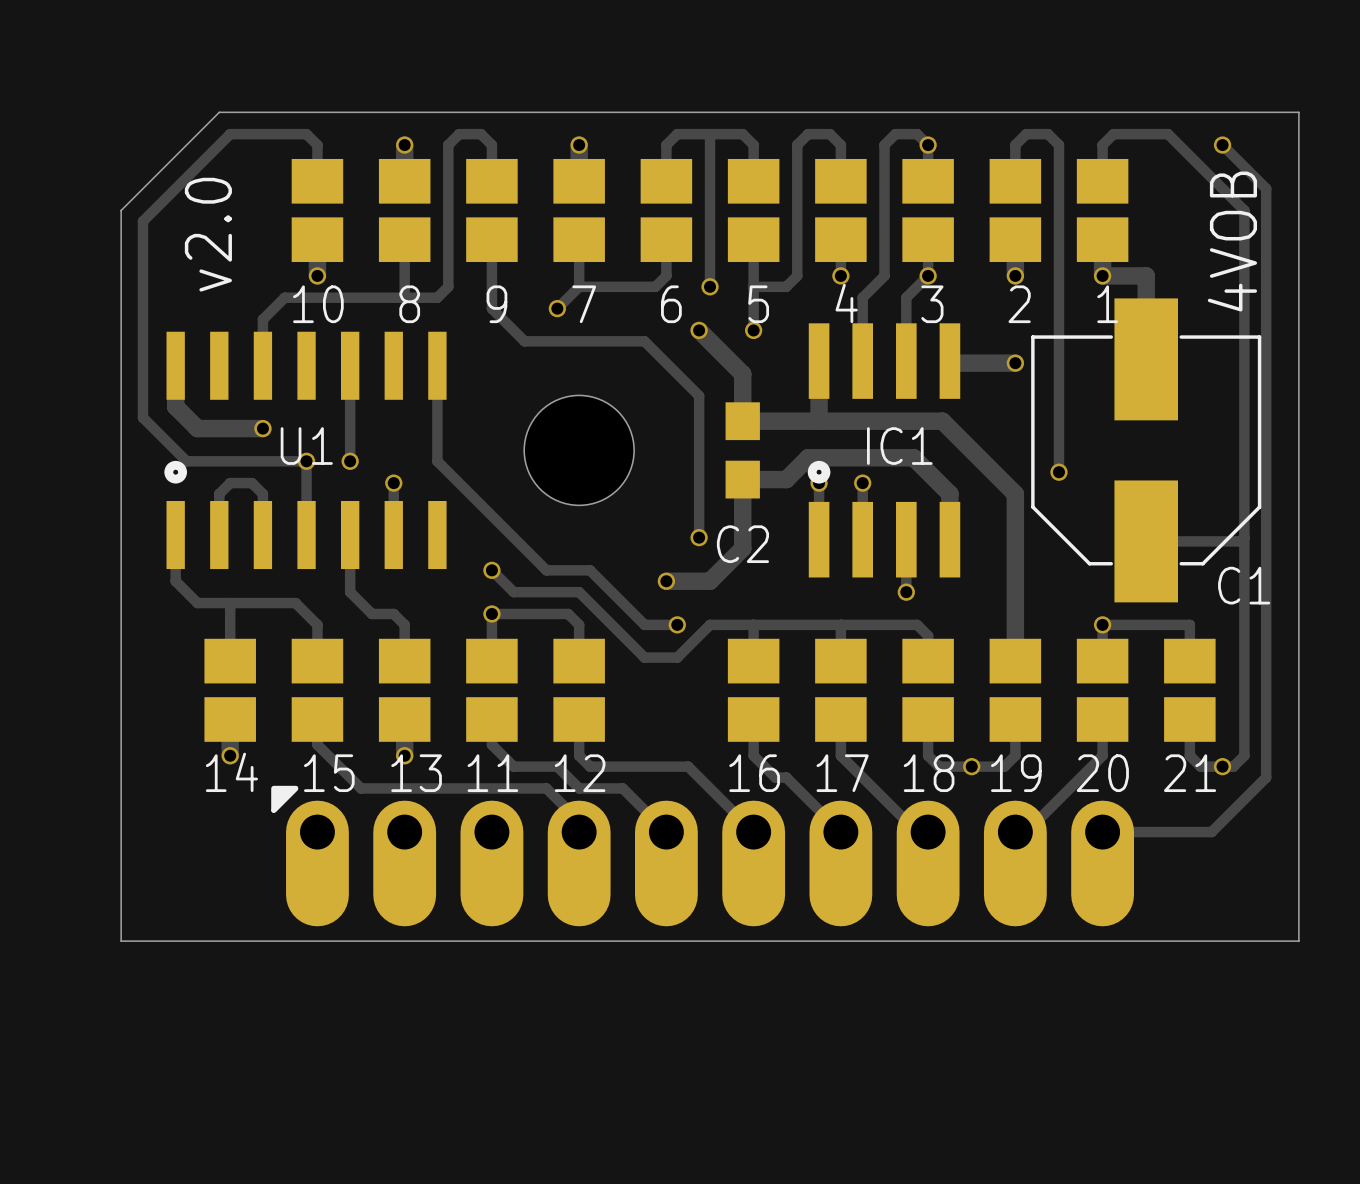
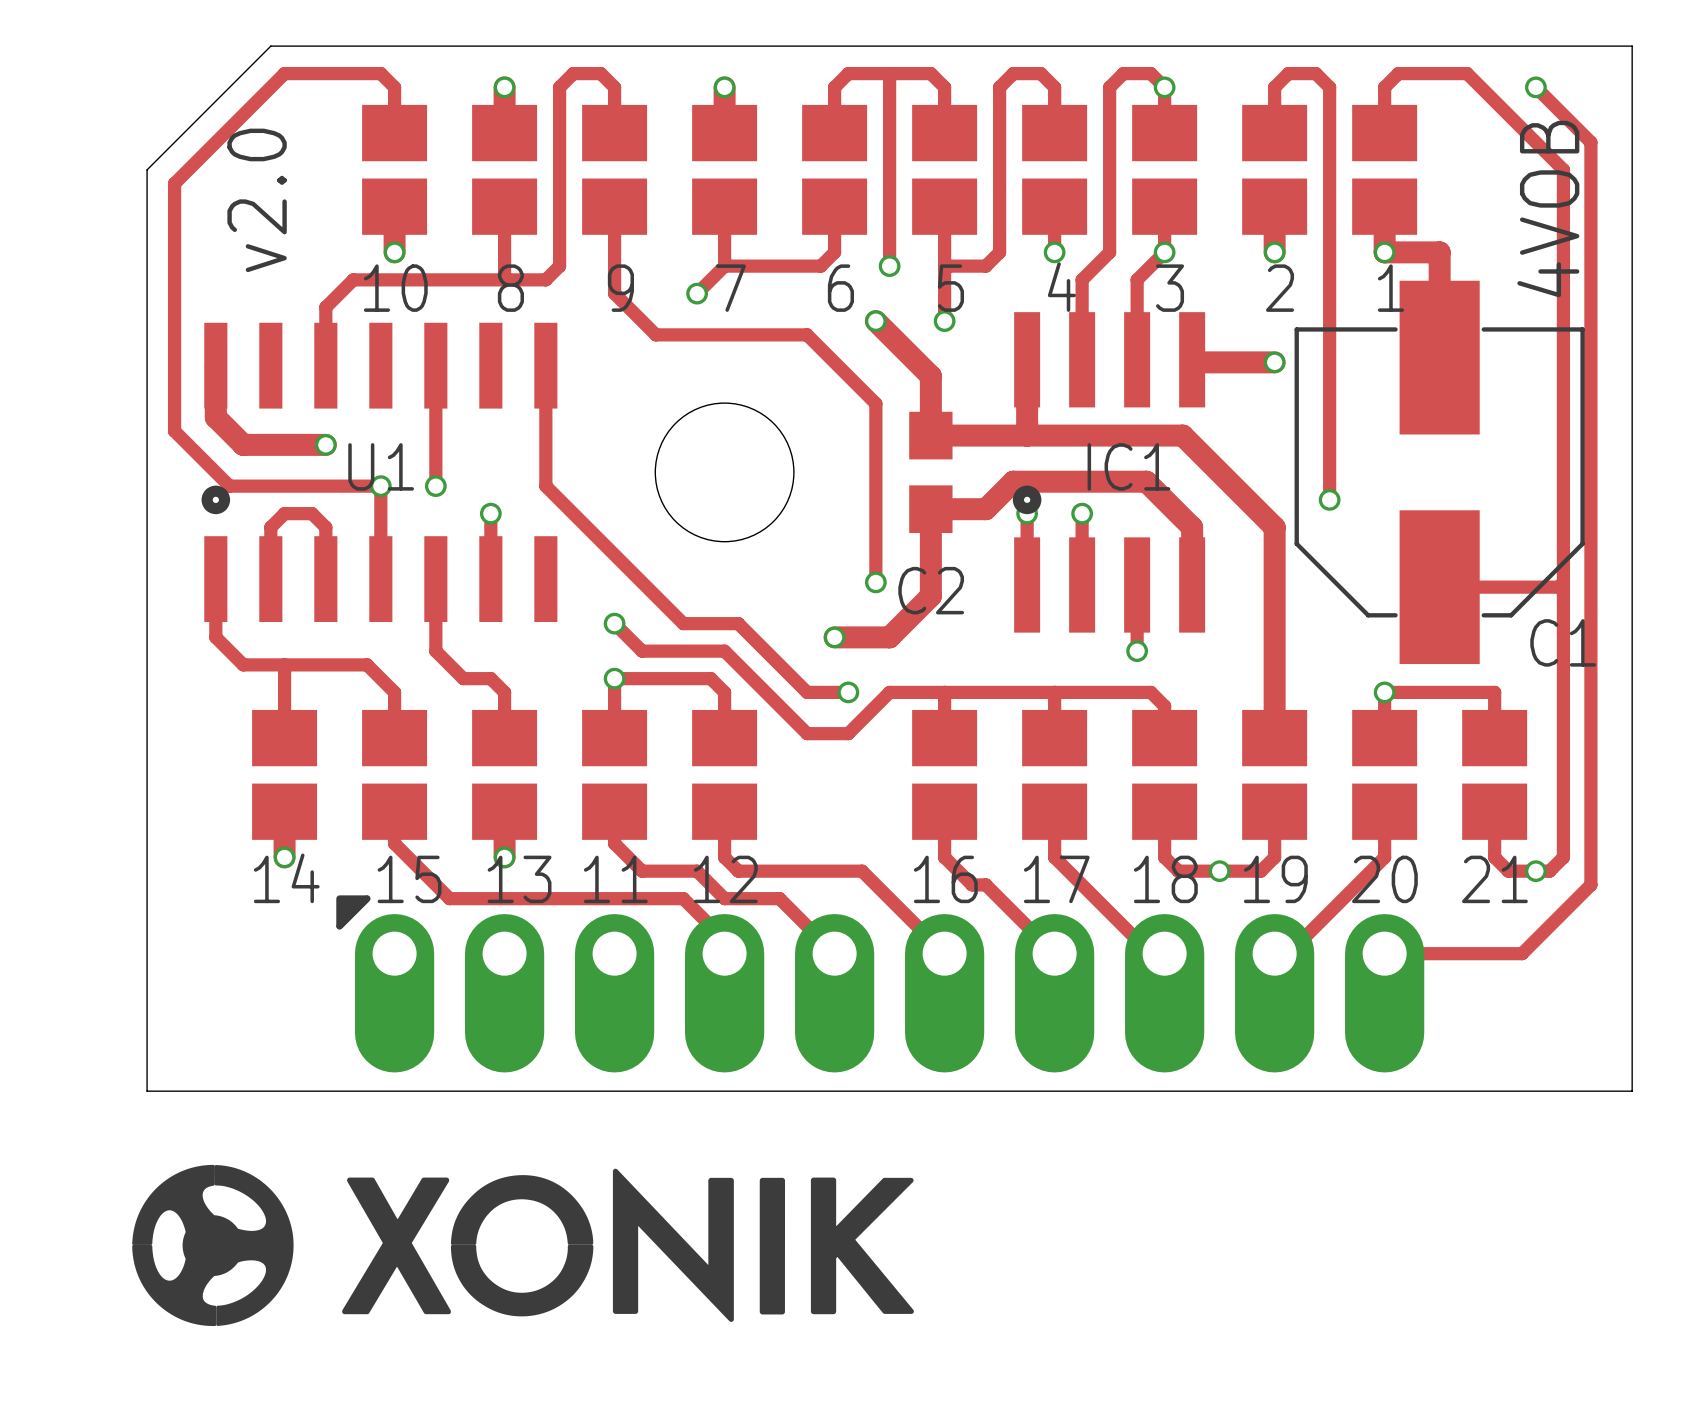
drawing: none -> [132, 1164, 914, 1327]

